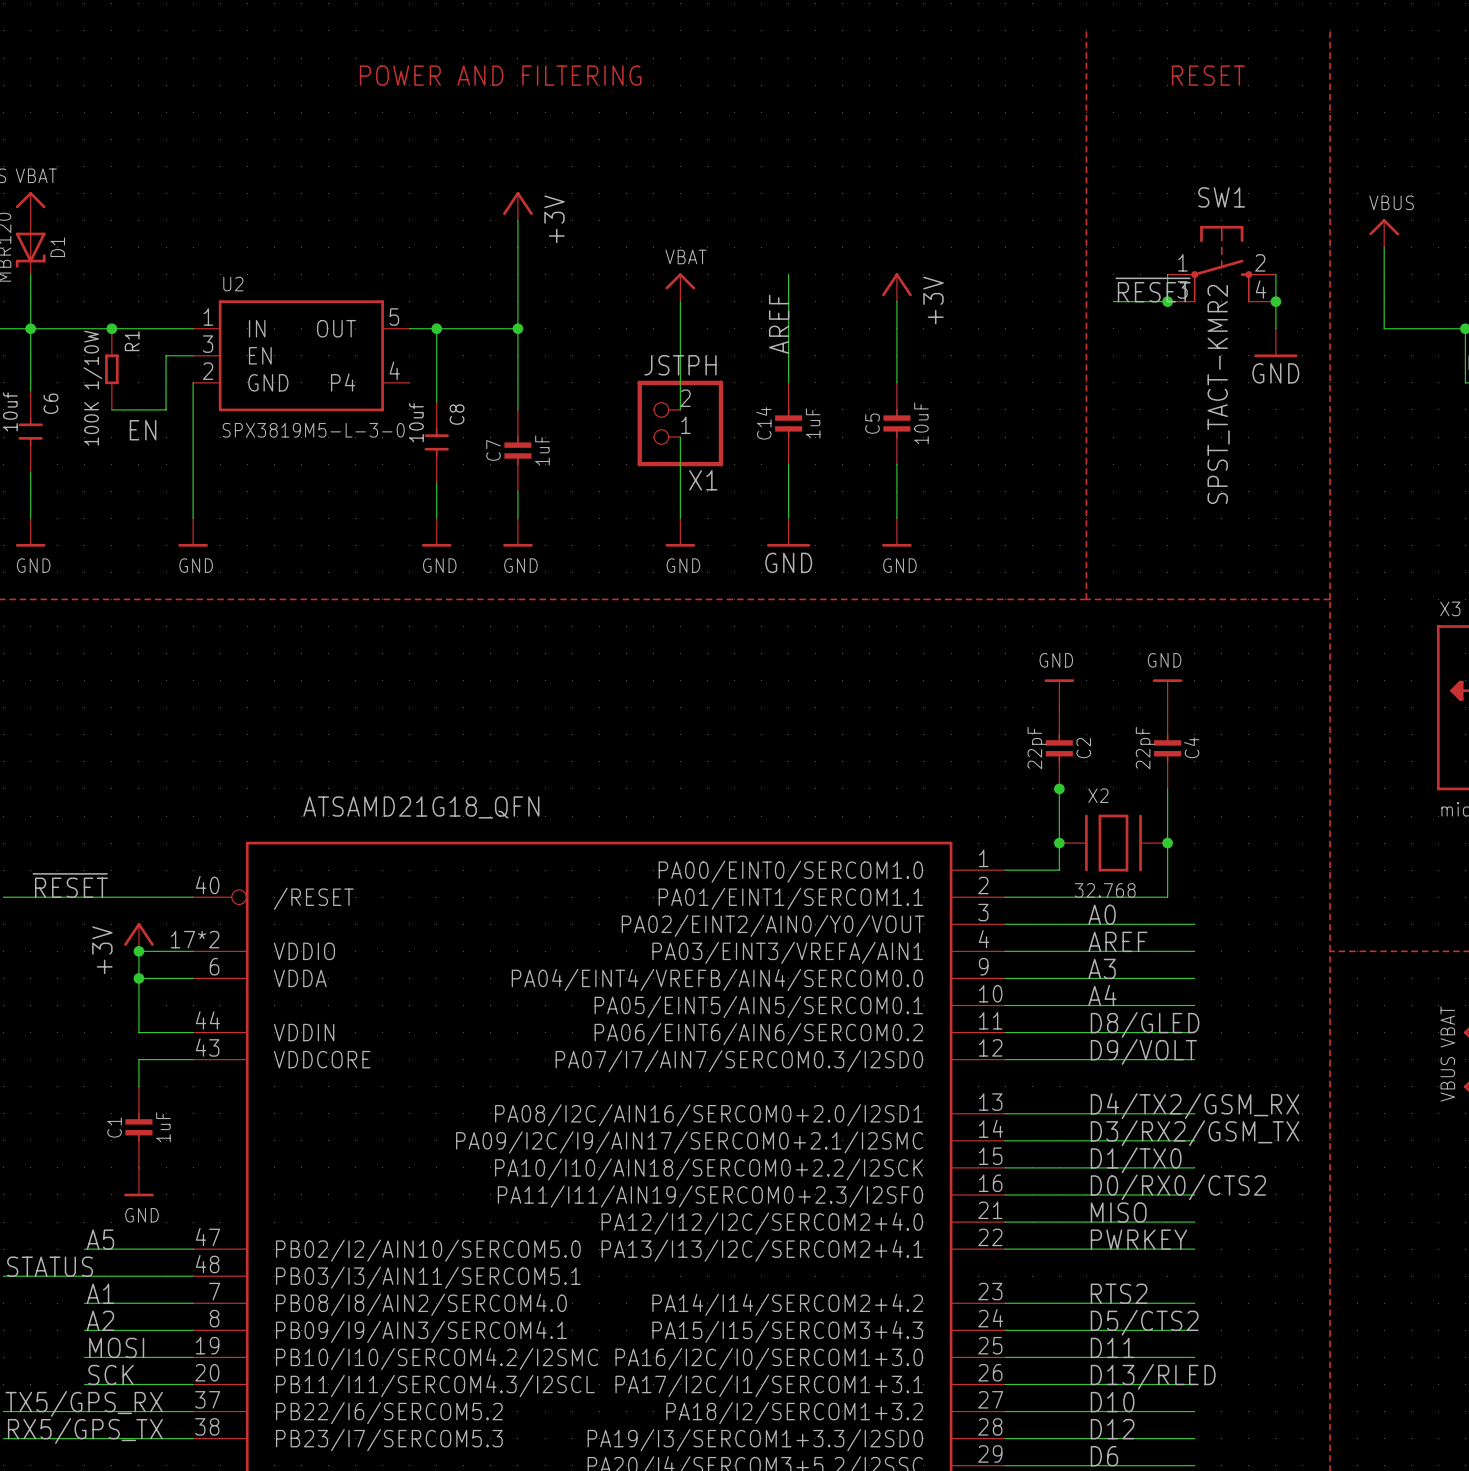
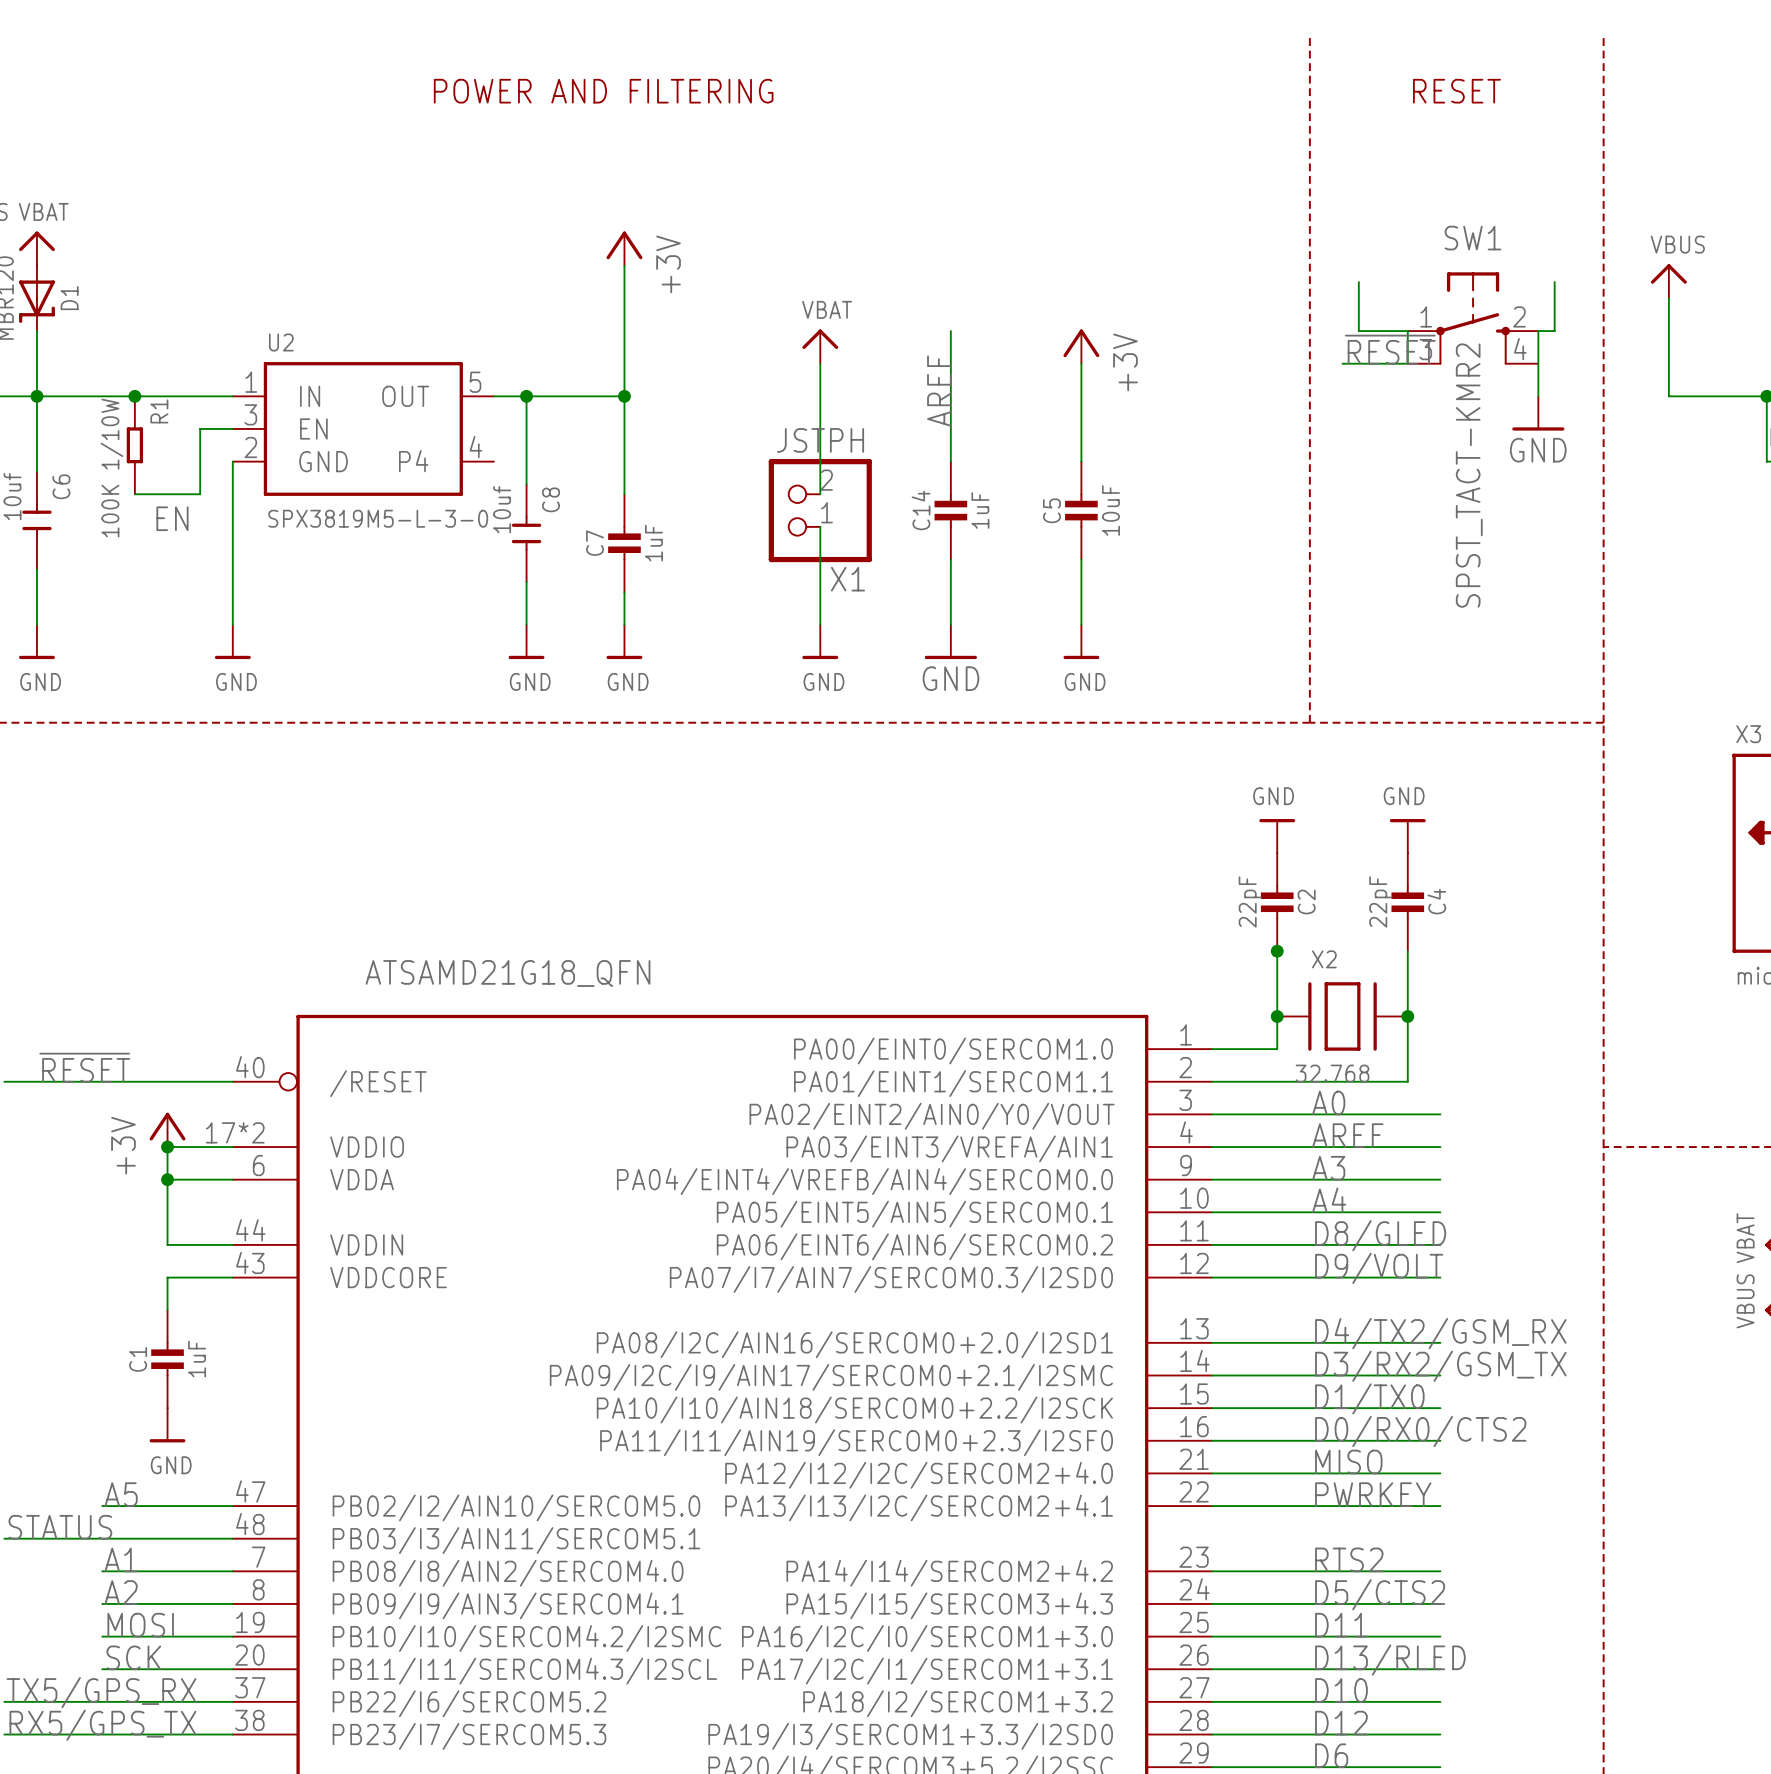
wire: none -> (1358, 282) (1358, 331) (1407, 331)
wire: none -> (1554, 282) (1554, 331) (1538, 331)
junction: (1167, 301) -> none
junction: (1275, 301) -> none

